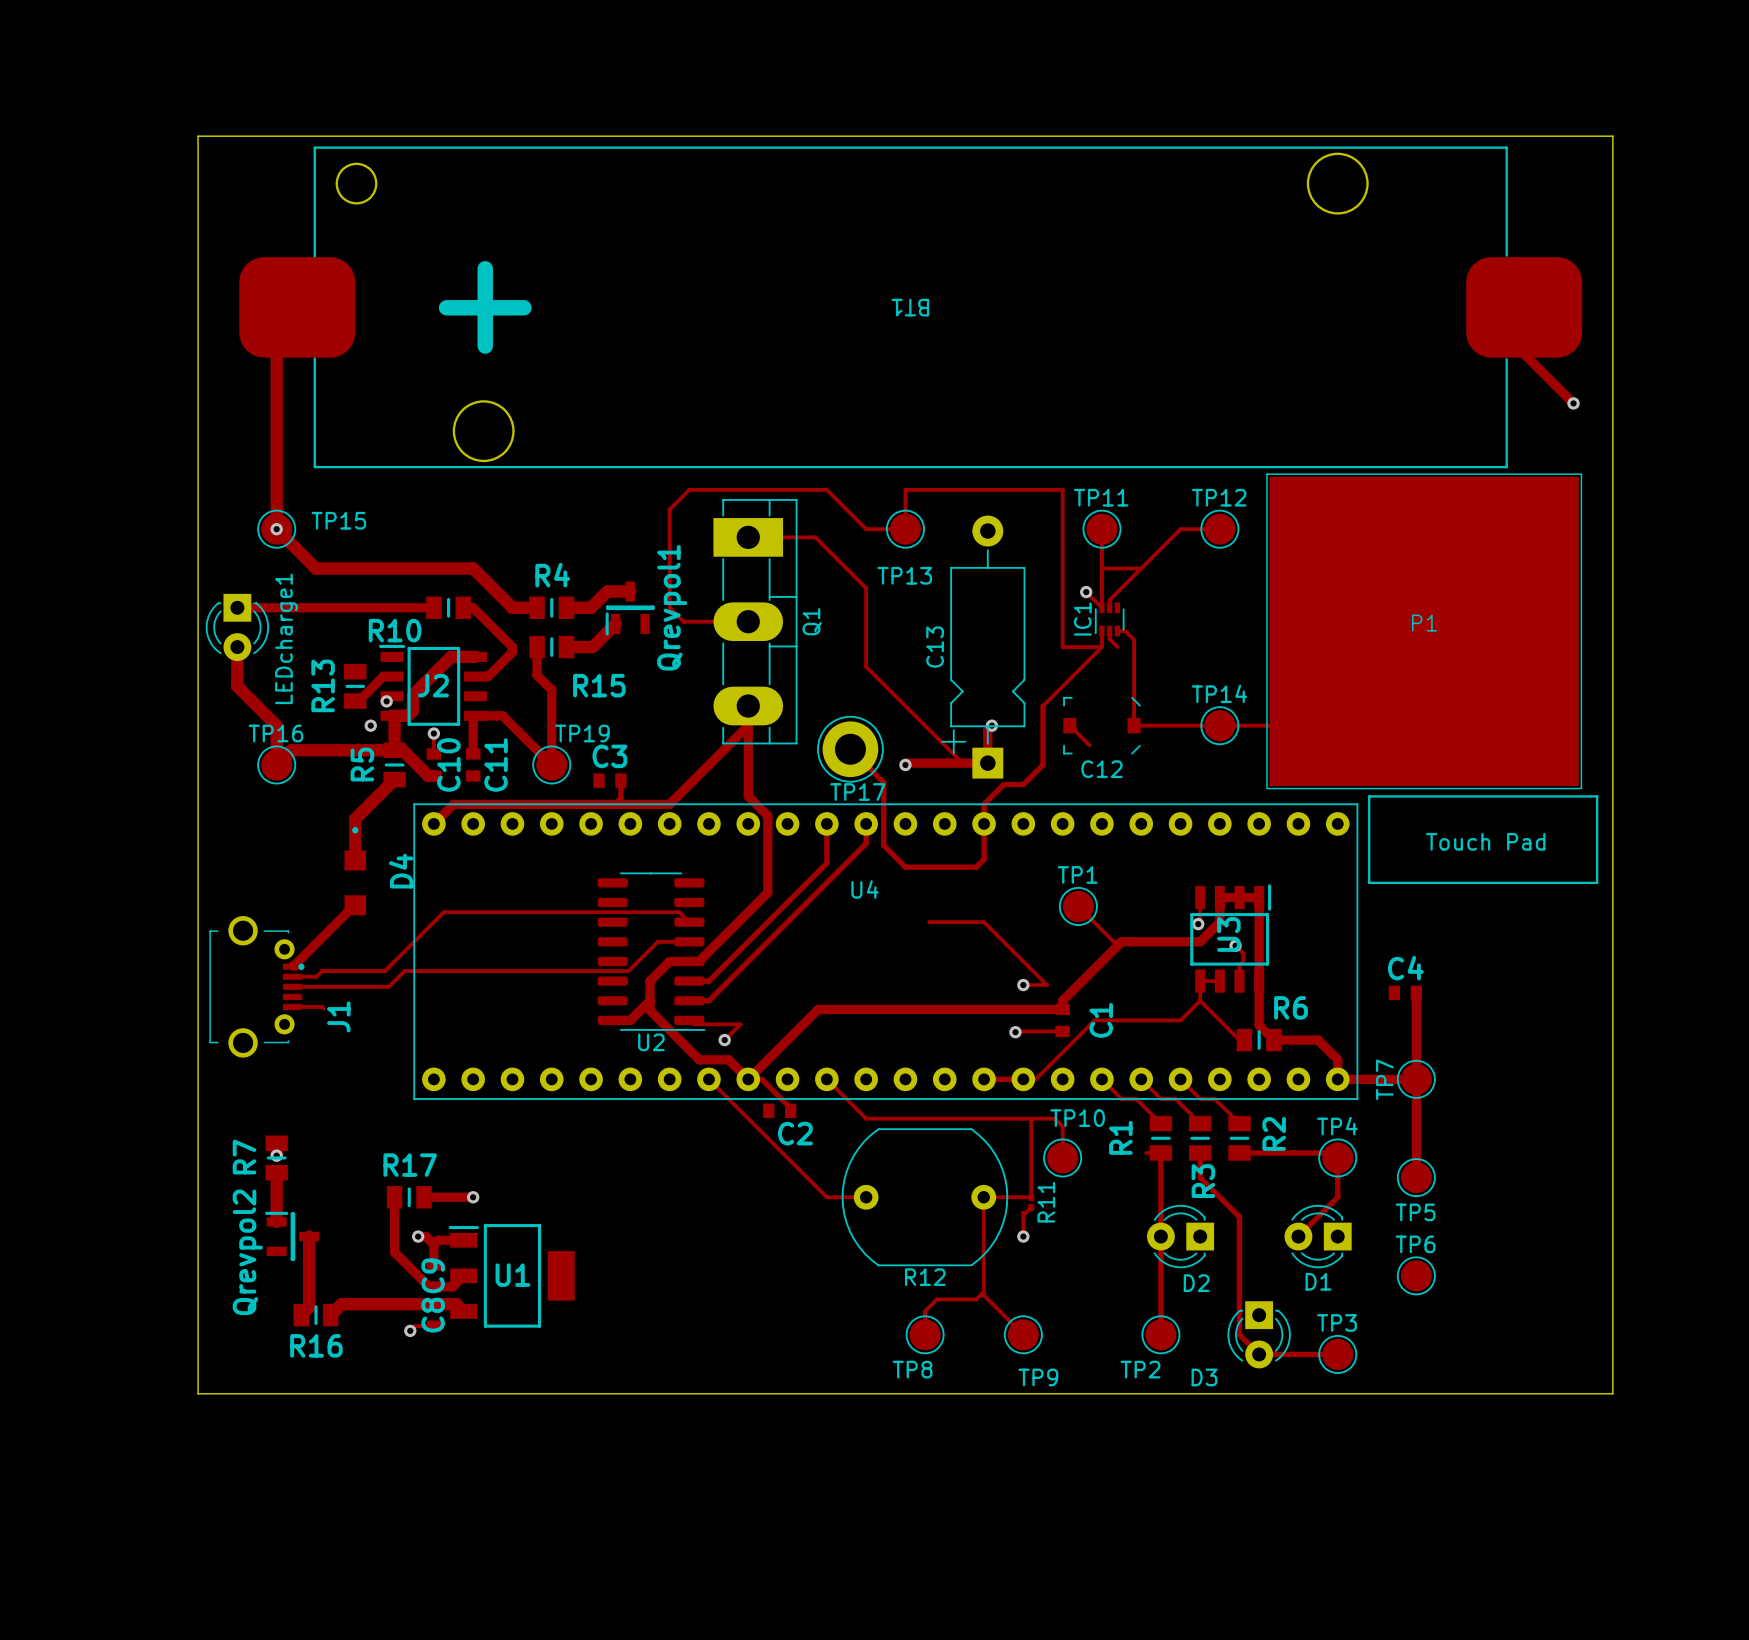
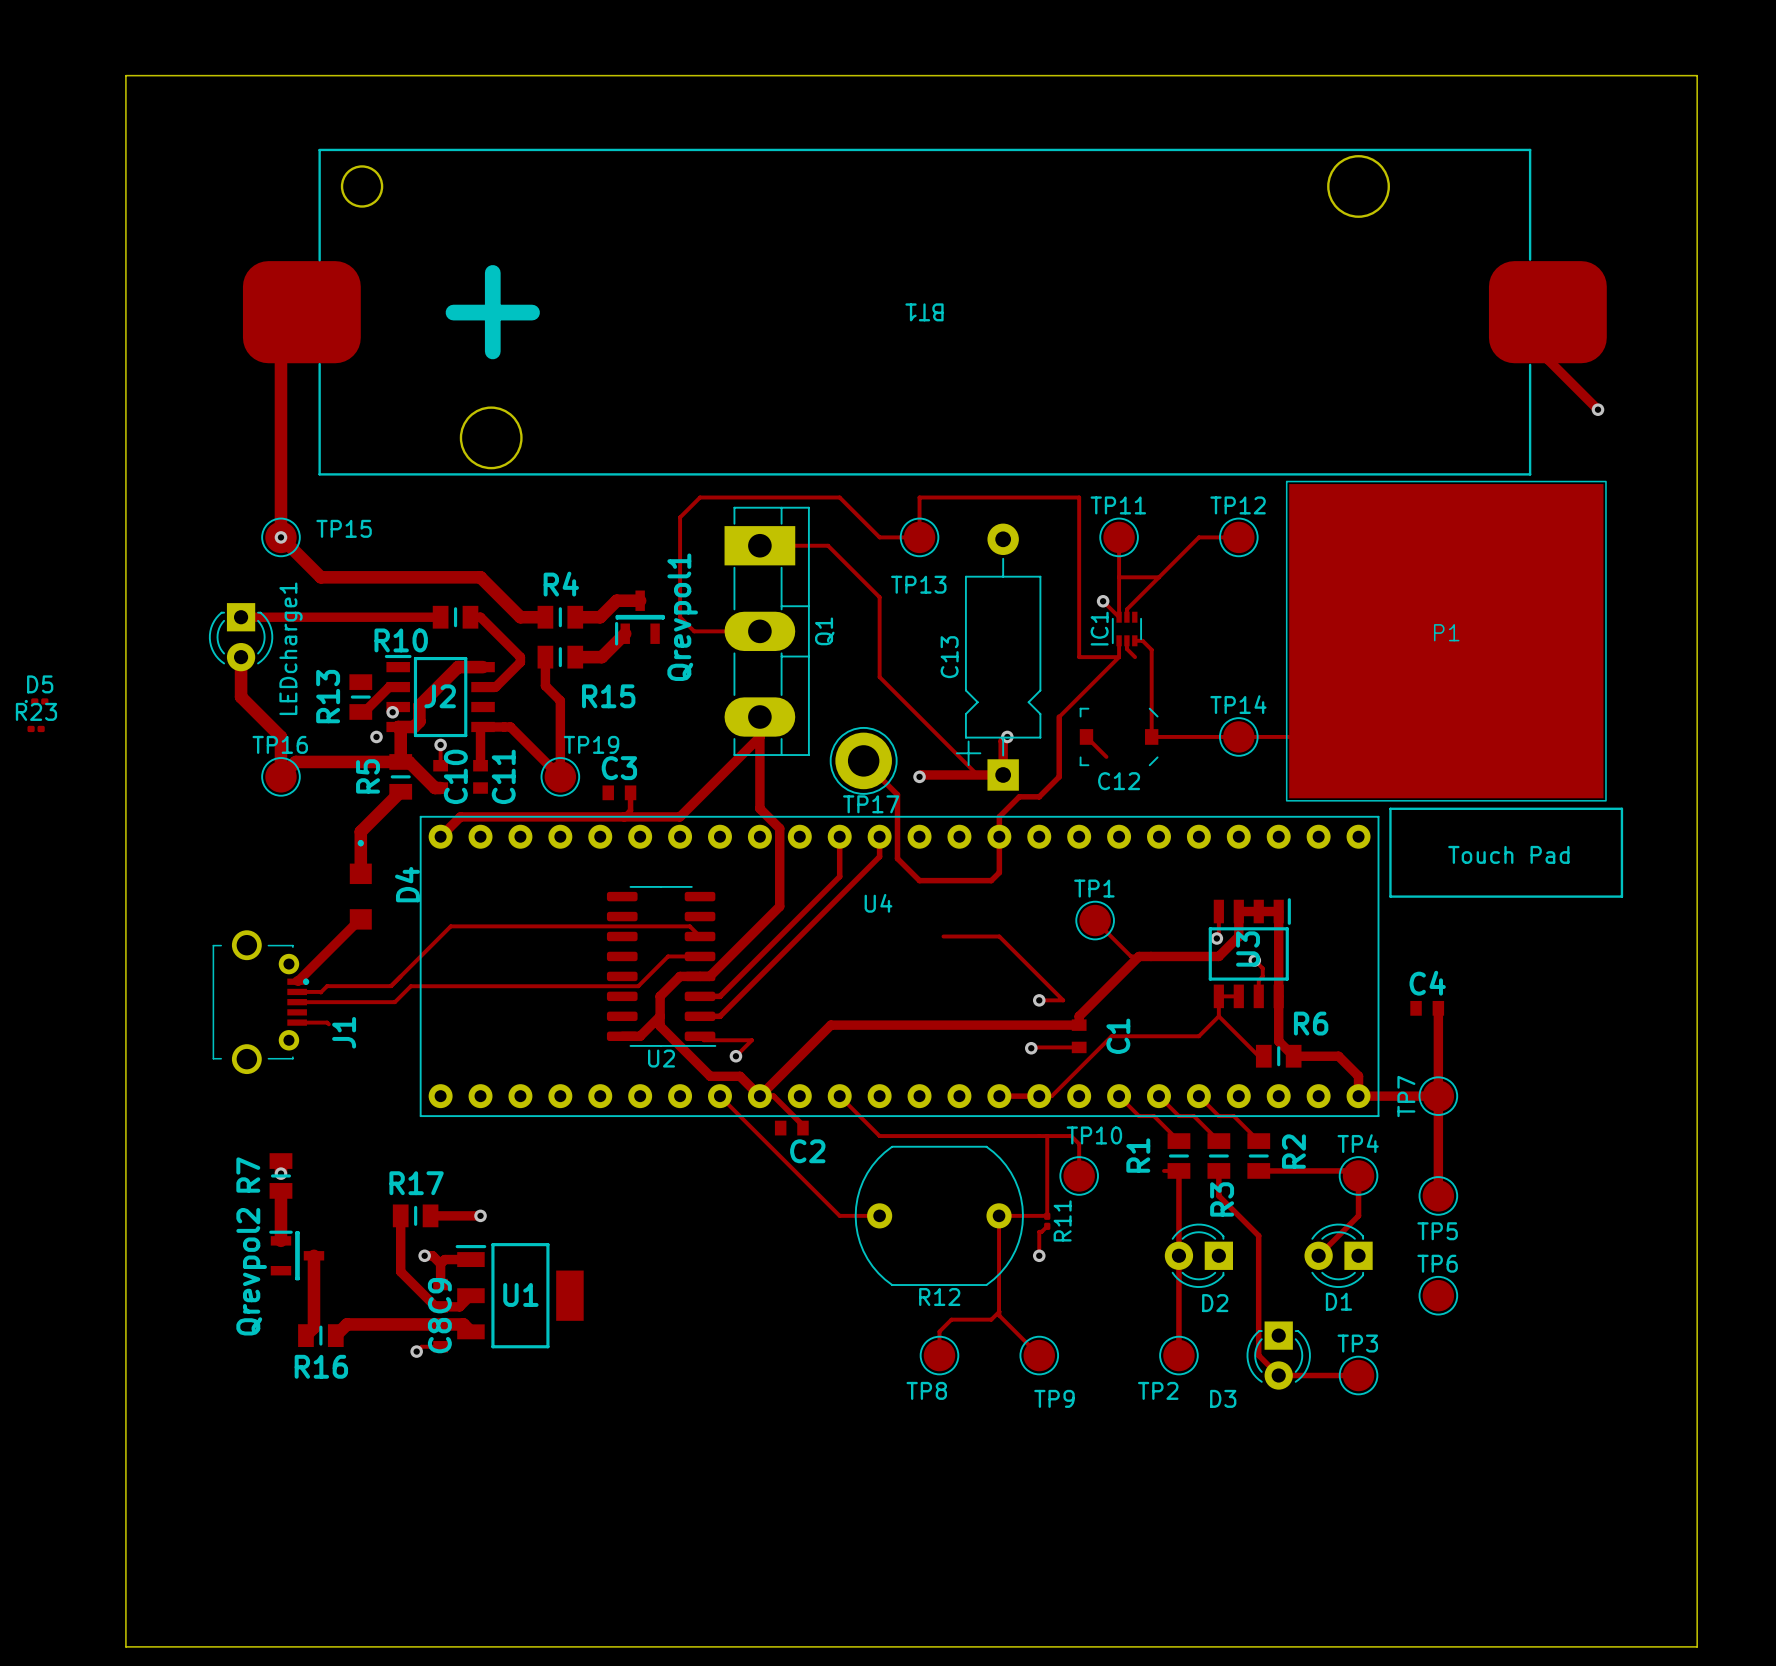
board edge: (198, 136) (1612, 136) (1612, 1393) (198, 1393) (198, 136) -> (125, 75) (125, 1646) (1697, 1646) (1697, 75) (125, 75)
D5: none -> (36, 701)
R23: none -> (36, 728)

